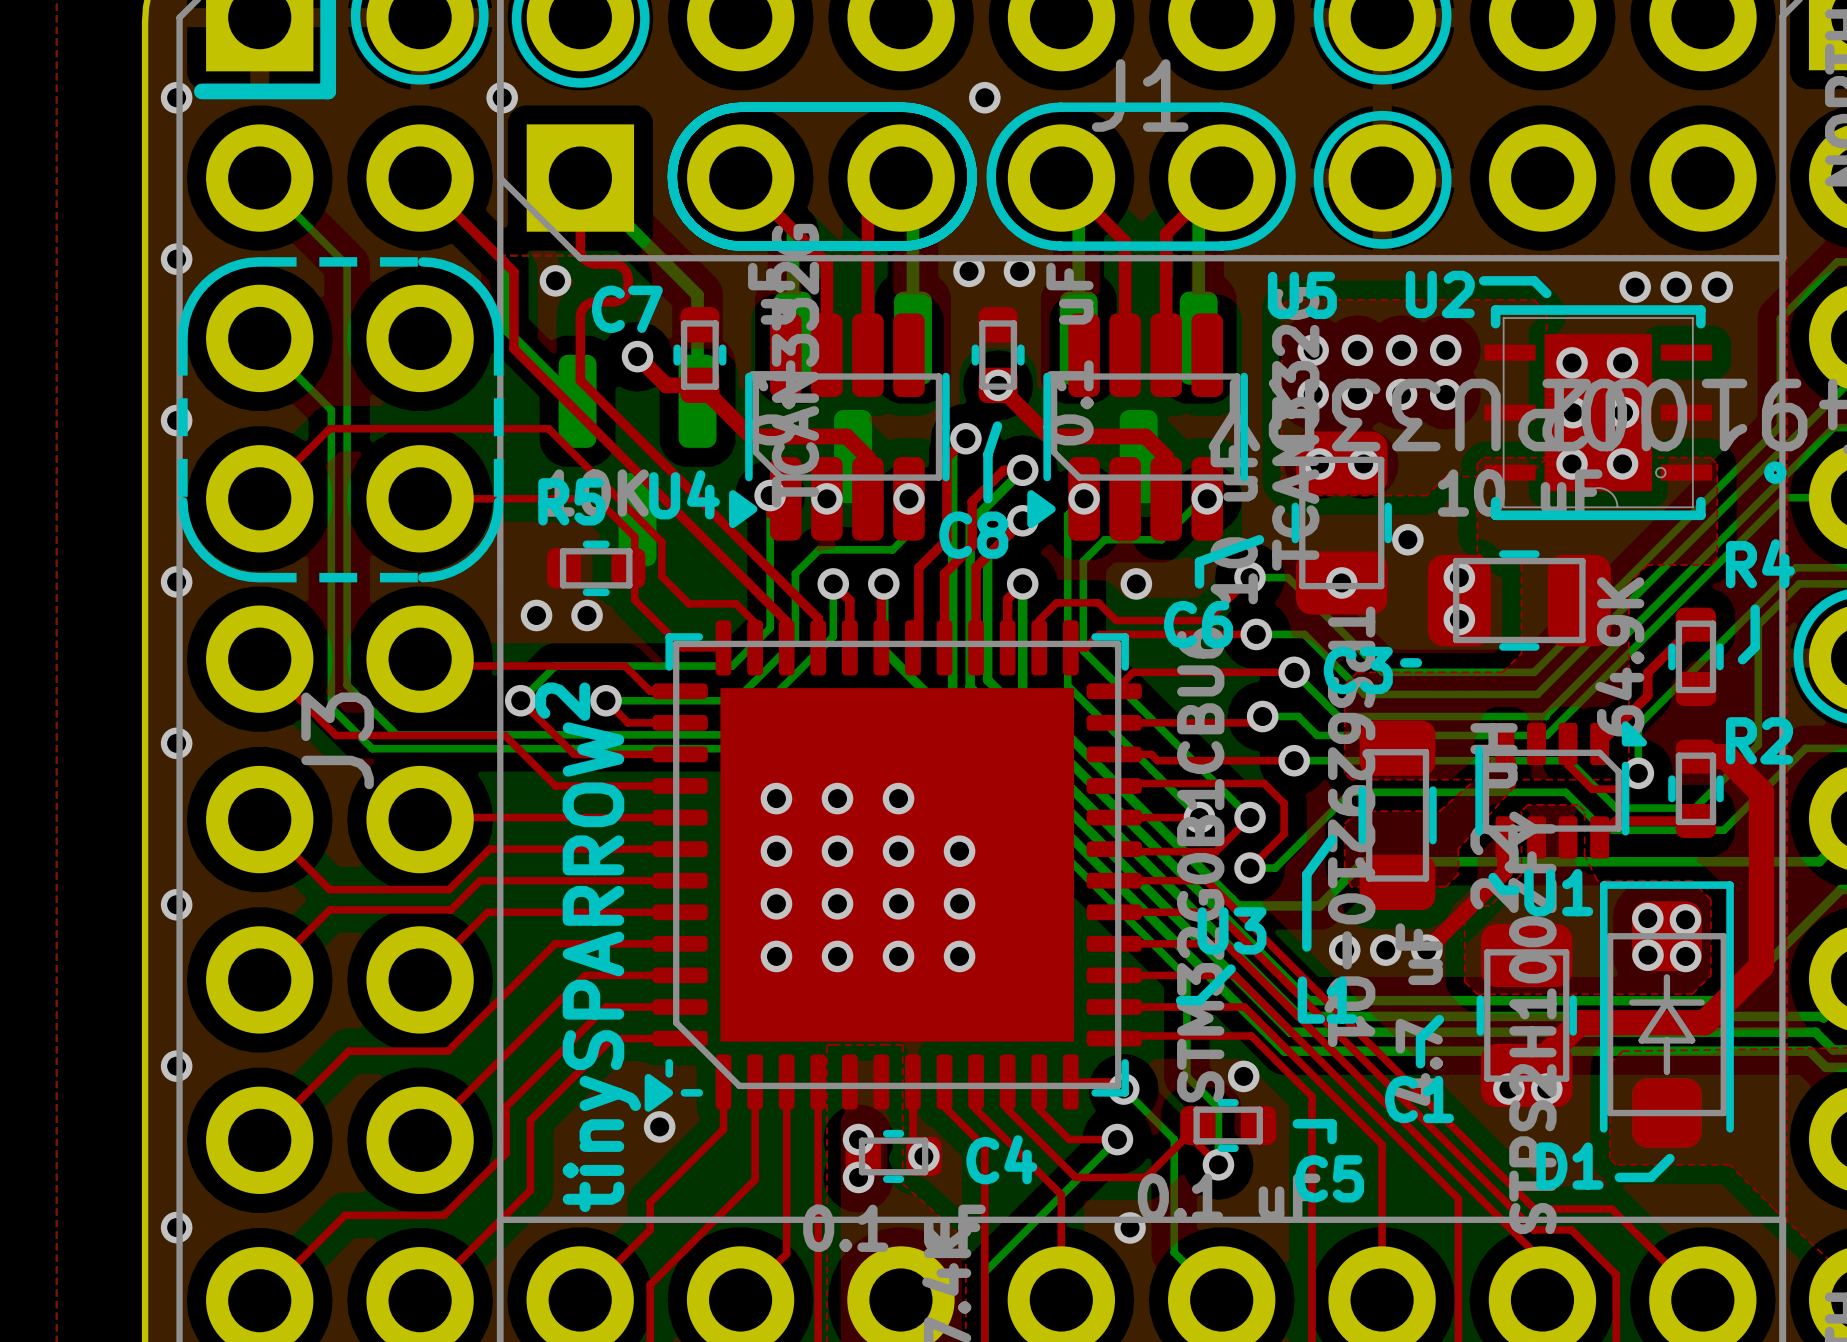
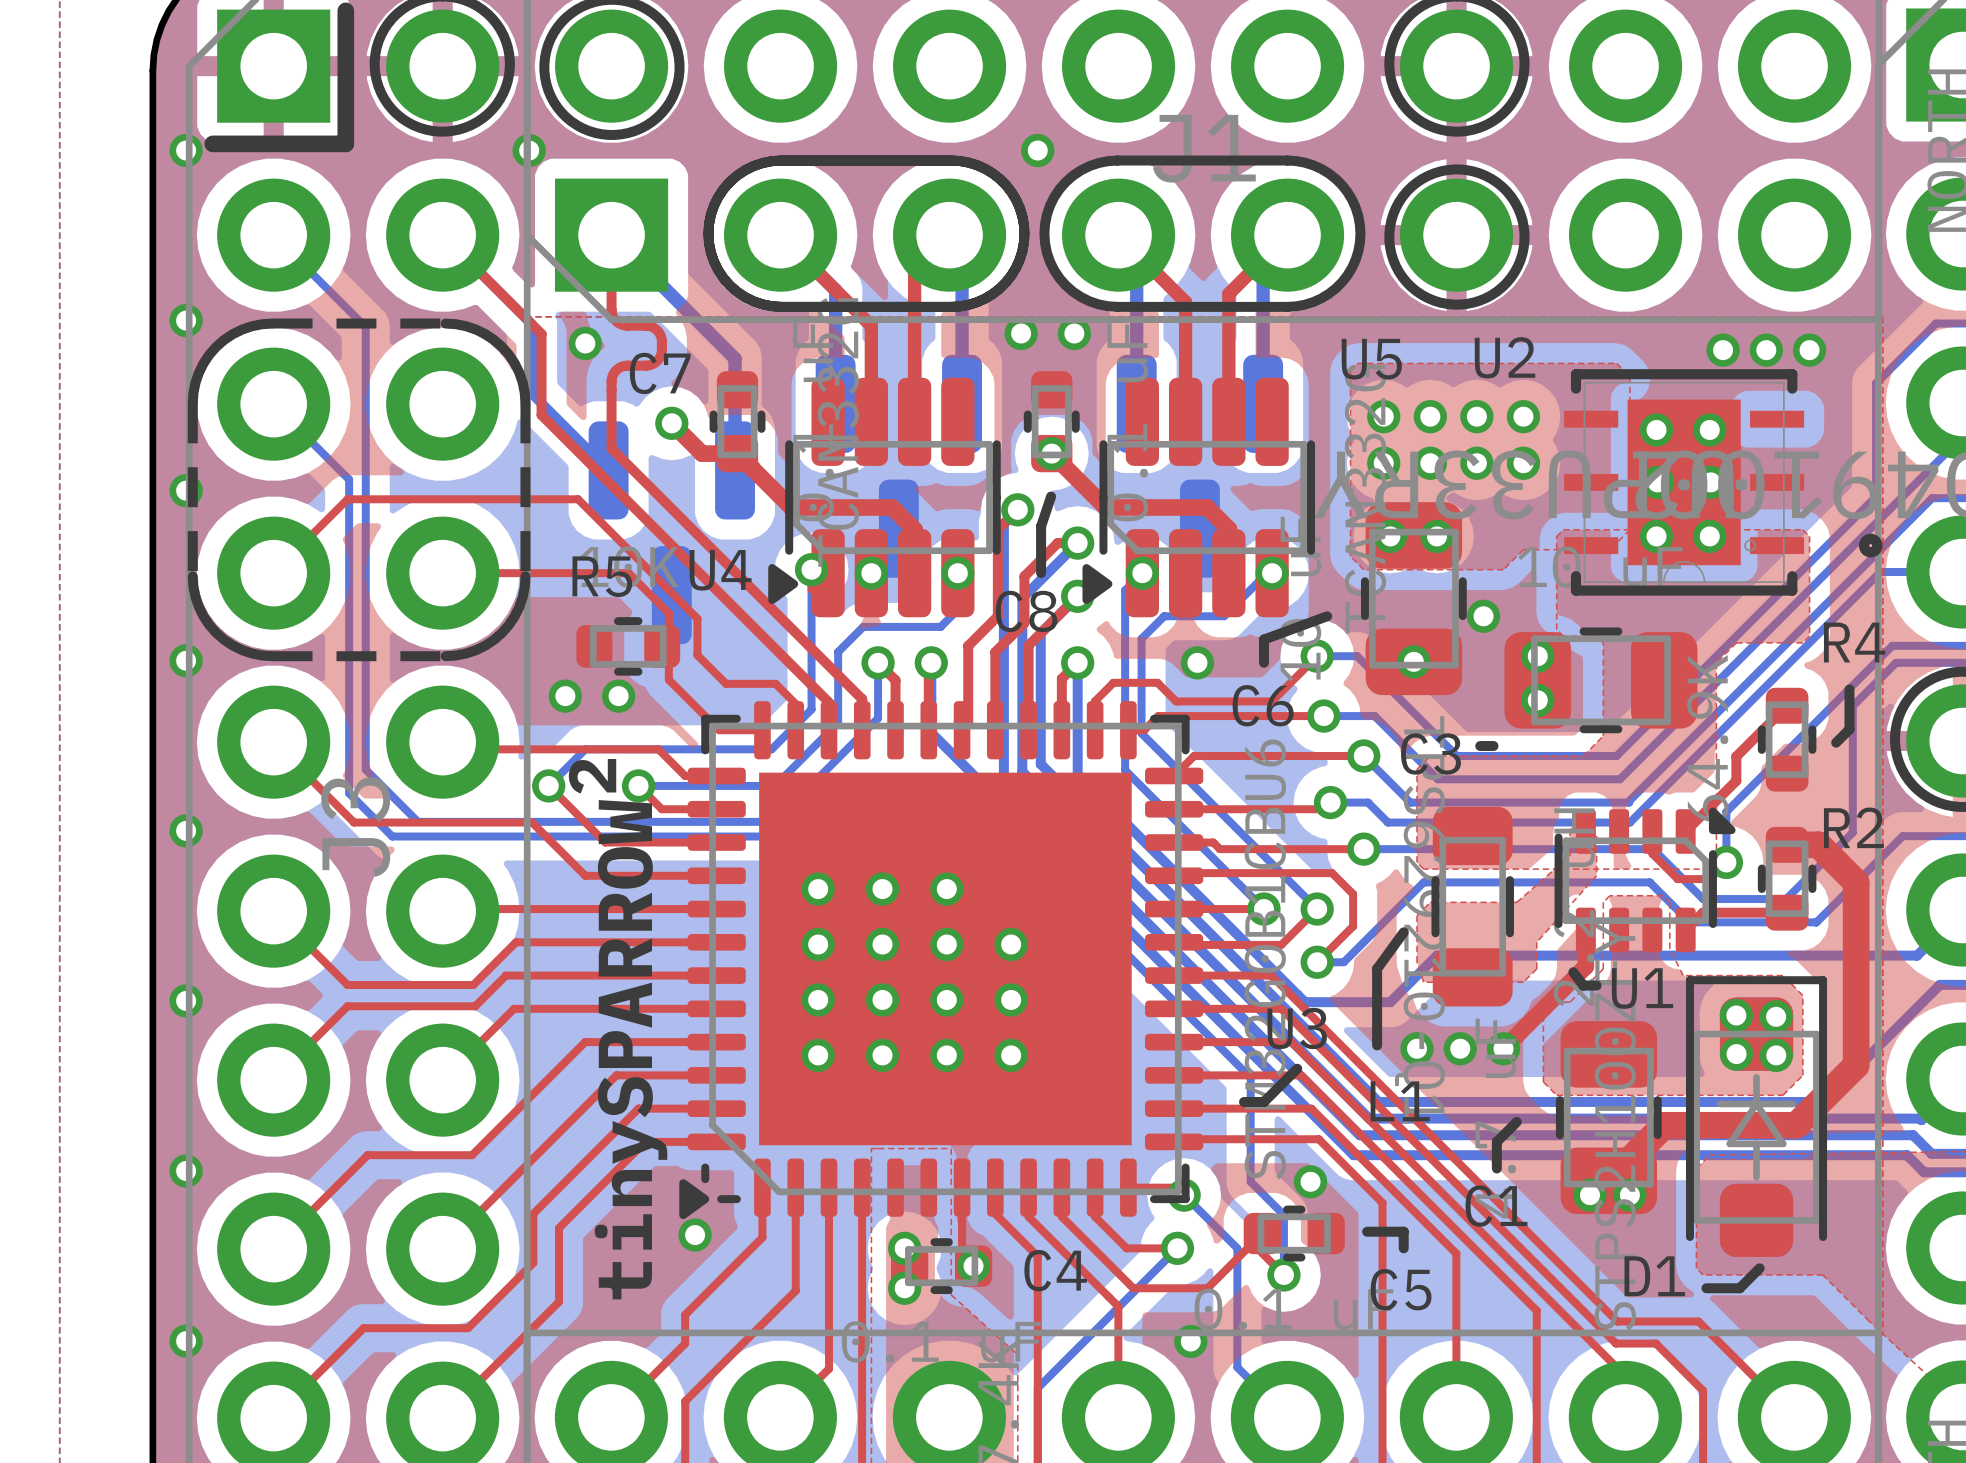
line: (1483, 280) (1534, 280) (1546, 293) -> none

